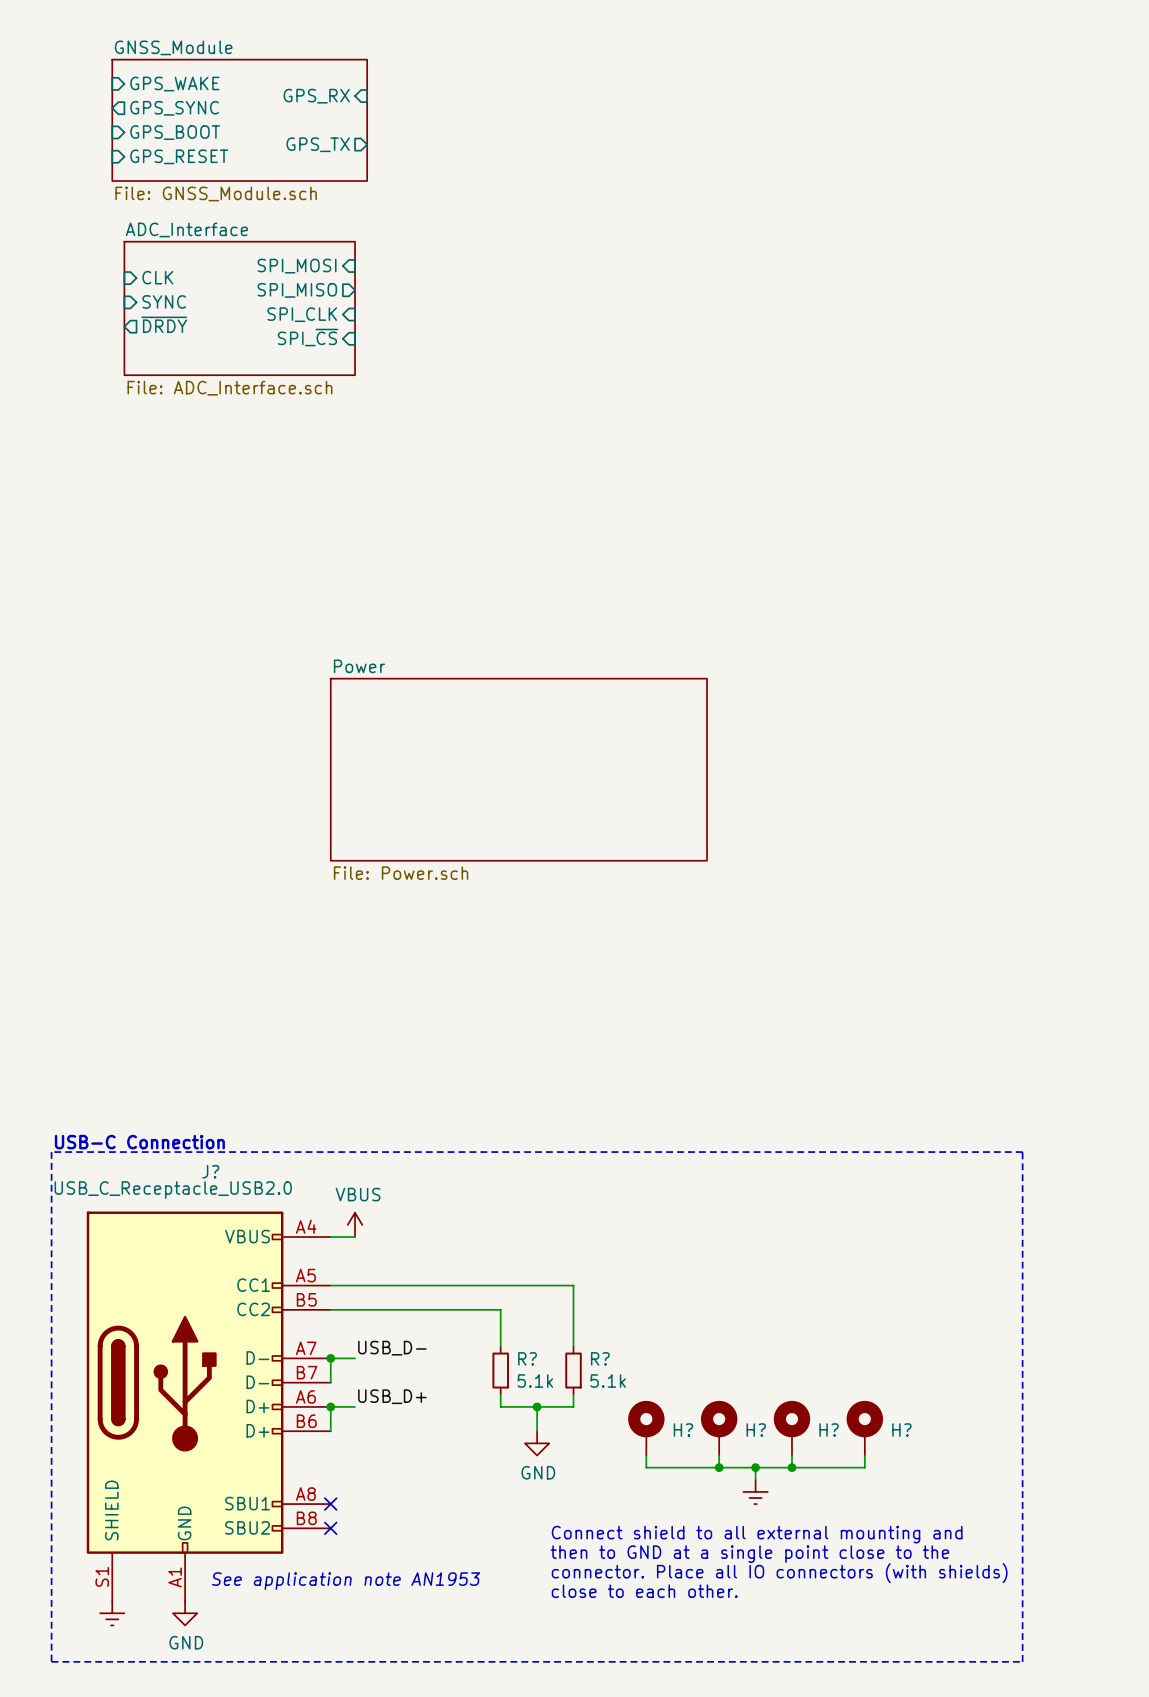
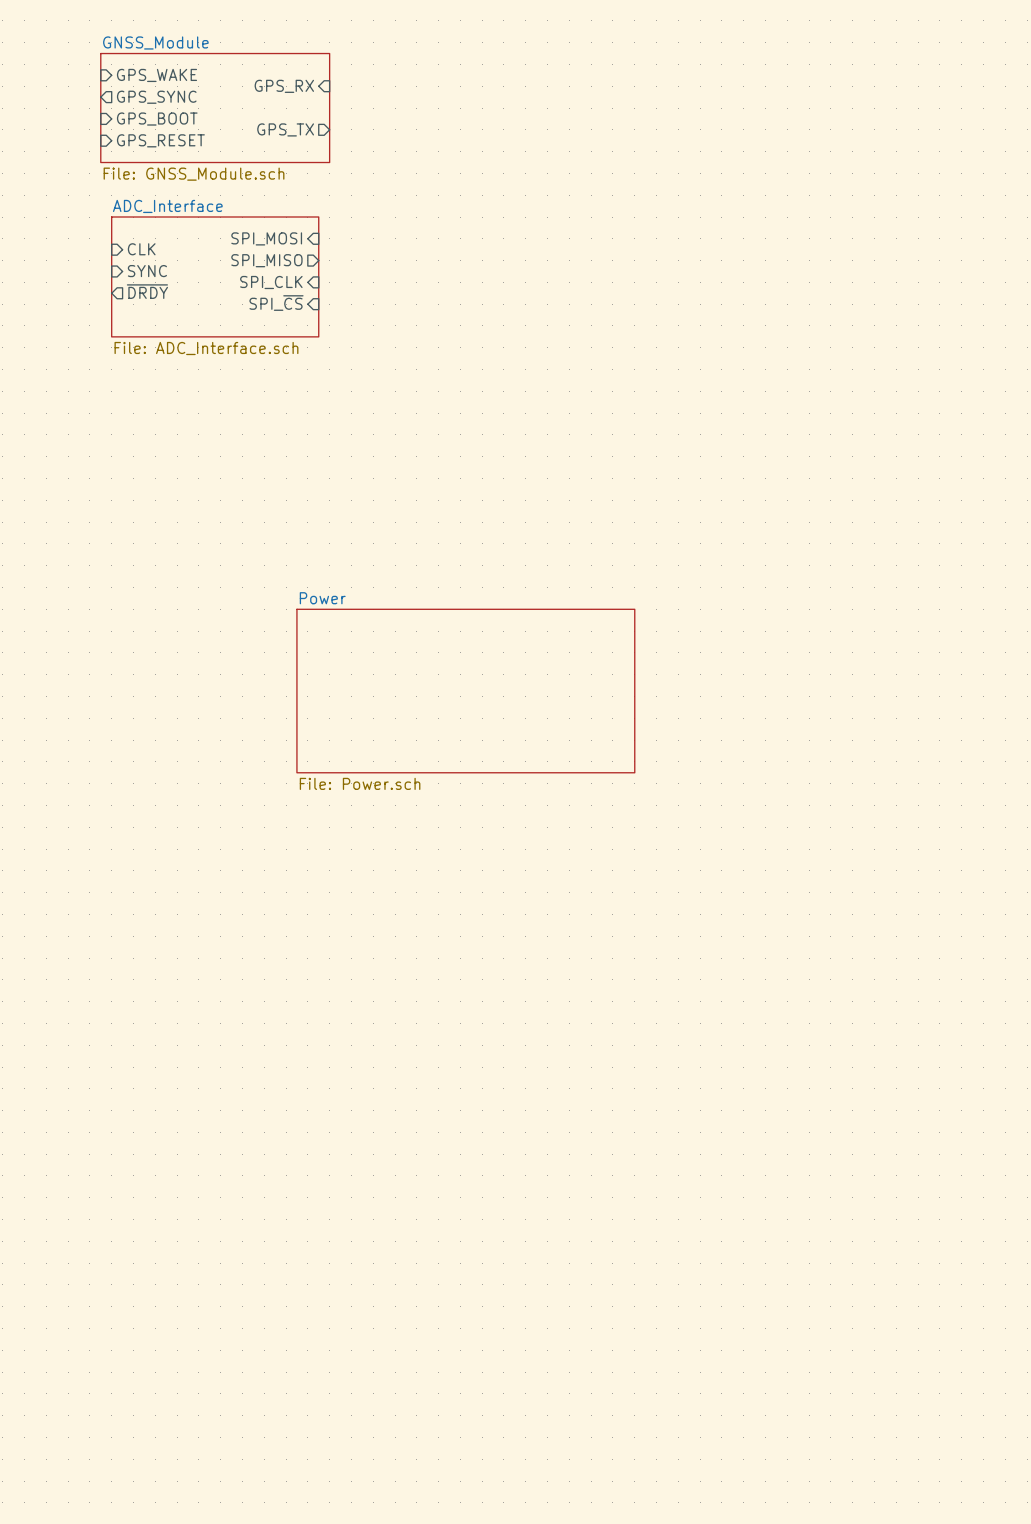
text: USB-C Connection (139, 1142) -> none
line: (51, 1152) (1022, 1152) (1022, 1661) (51, 1661) (51, 1152) -> none
power symbol: VBUS (355, 1224) -> none
wire: (330, 1237) (355, 1237) -> none
wire: (330, 1285) (573, 1285) (573, 1346) -> none
wire: (330, 1309) (500, 1309) (500, 1346) -> none
label: USB_D- (392, 1348) -> none
junction: (330, 1358) -> none
wire: (355, 1358) (330, 1358) (330, 1382) -> none
R?: 5.1k (500, 1370) -> none
R?: 5.1k (573, 1370) -> none
wire: (500, 1394) (500, 1406) (573, 1406) (573, 1394) -> none
label: USB_D+ (392, 1396) -> none
J?: USB_C_Receptacle_USB2.0 (208, 1406) -> none
junction: (330, 1406) -> none
wire: (355, 1406) (330, 1406) (330, 1431) -> none
wire: (537, 1406) (537, 1431) -> none
junction: (537, 1406) -> none
H?: (646, 1428) -> none
H?: (719, 1428) -> none
H?: (791, 1428) -> none
H?: (864, 1428) -> none
power symbol: GND (537, 1443) -> none
wire: (646, 1455) (646, 1467) (864, 1467) (864, 1455) -> none
wire: (719, 1455) (719, 1467) -> none
wire: (791, 1455) (791, 1467) -> none
junction: (719, 1467) -> none
wire: (755, 1467) (755, 1479) -> none
junction: (755, 1467) -> none
junction: (791, 1467) -> none
power symbol: (755, 1491) -> none
no-connect mark: (330, 1504) -> none
no-connect mark: (330, 1528) -> none
text: Connect shield to all external mounting and (757, 1534) -> none
text: then to GND at a single point close to the (749, 1554) -> none
text: connector. Place all IO connectors (with shields) (779, 1573) -> none
text: See application note AN1953 (346, 1581) -> none
text: close to each other. (644, 1591) -> none
power symbol: (112, 1613) -> none
power symbol: GND (185, 1613) -> none

